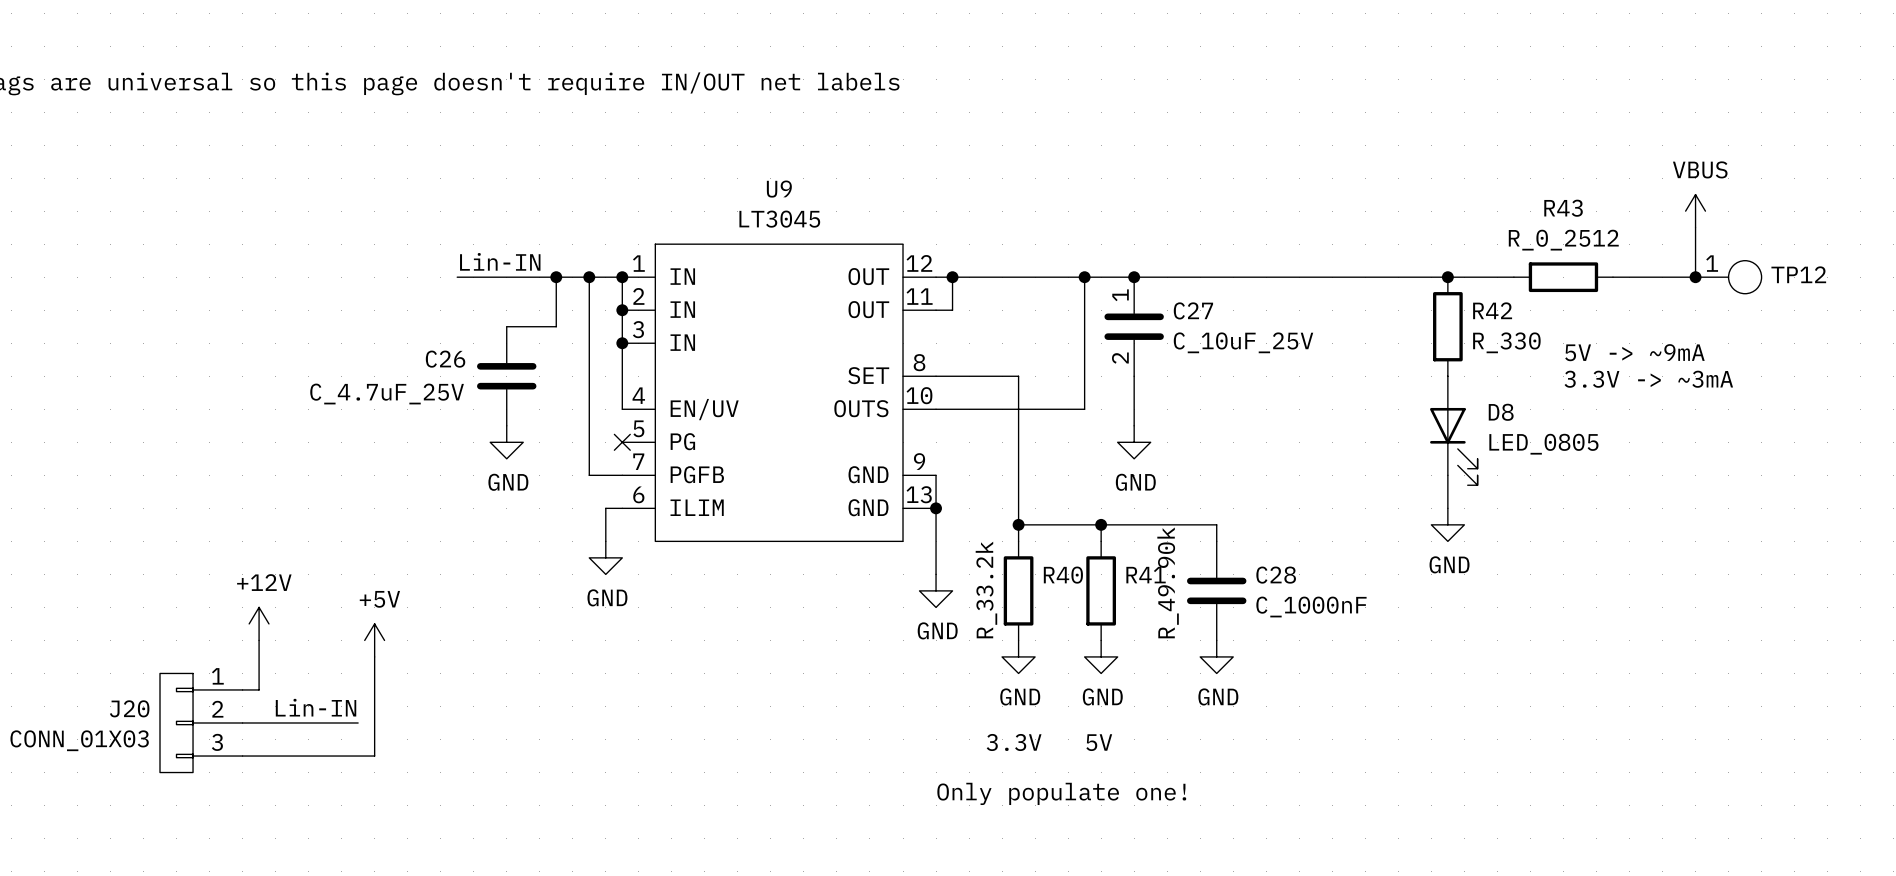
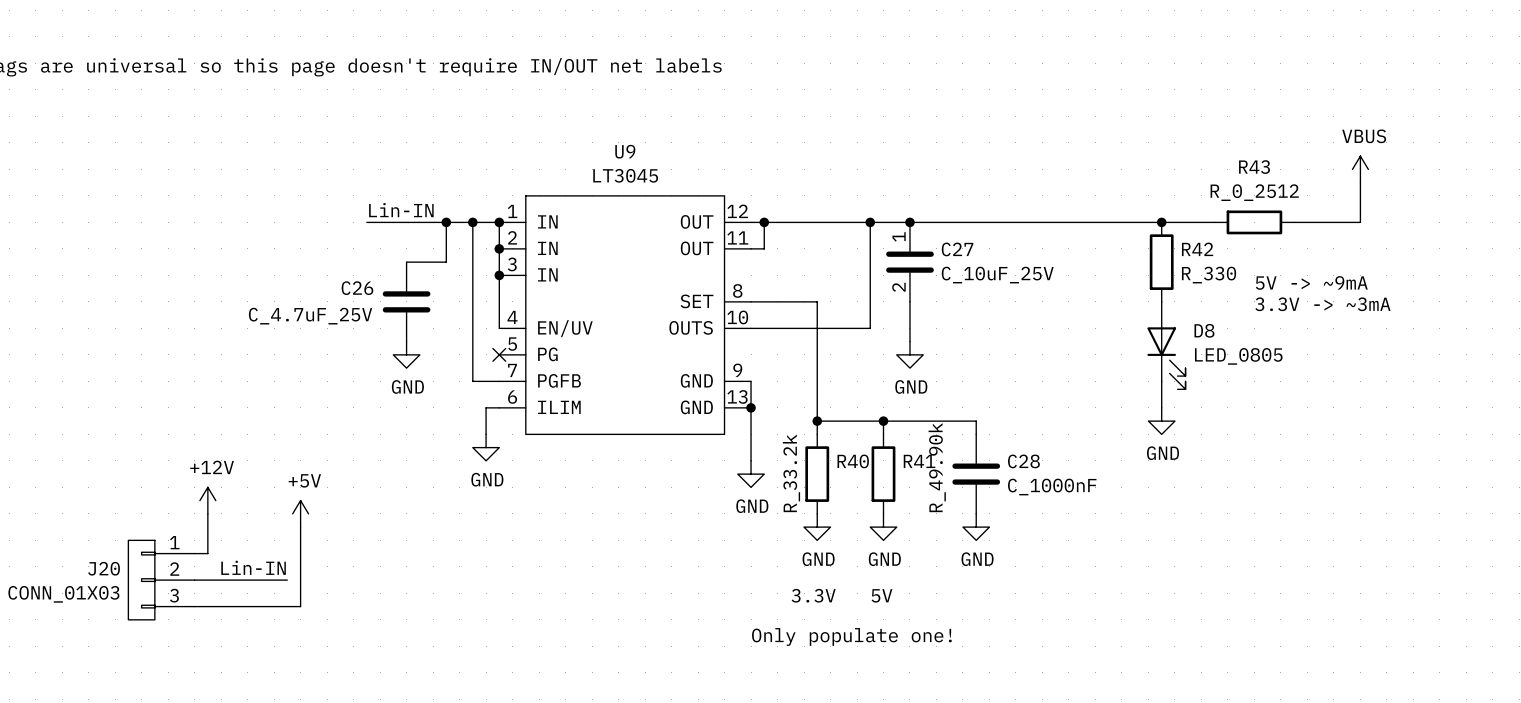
junction: (1695, 277) -> none
TP12: (1728, 277) -> none

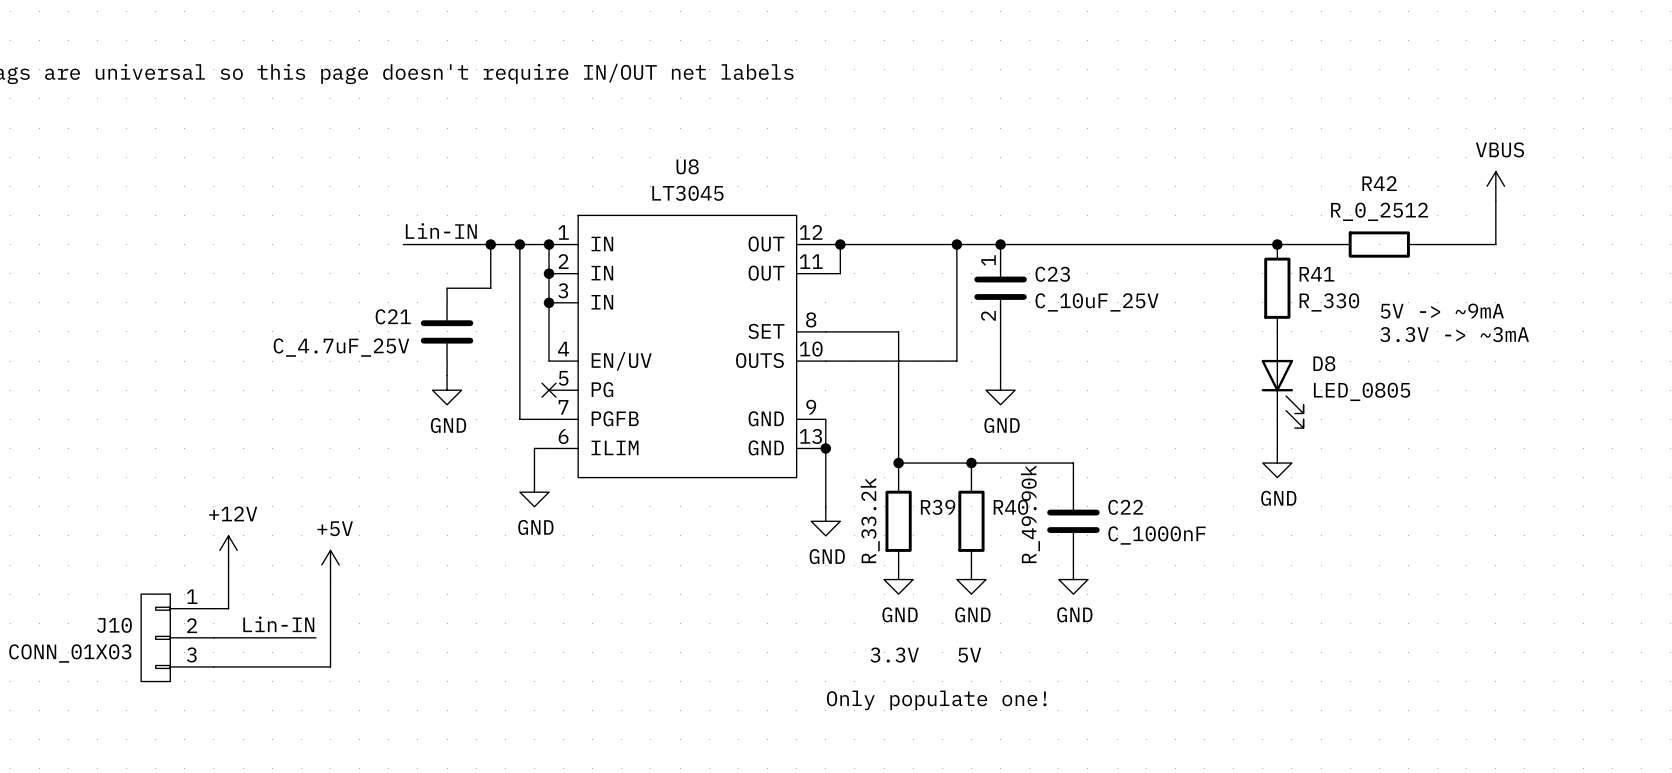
U9 name: U9 (625, 151) -> U8 (687, 166)
R43 name: R43 (1254, 167) -> R42 (1379, 183)
C27 name: C27 (957, 249) -> C23 (1052, 274)
R42 name: R42 (1197, 249) -> R41 (1316, 274)
C26 name: C26 (357, 288) -> C21 (393, 316)
R40 name: R40 (853, 461) -> R39 (938, 507)
R41 name: R41 (919, 461) -> R40 (1010, 507)
C28 name: C28 (1023, 461) -> C22 (1125, 507)
J20 name: J20 (104, 568) -> J10 (114, 625)

